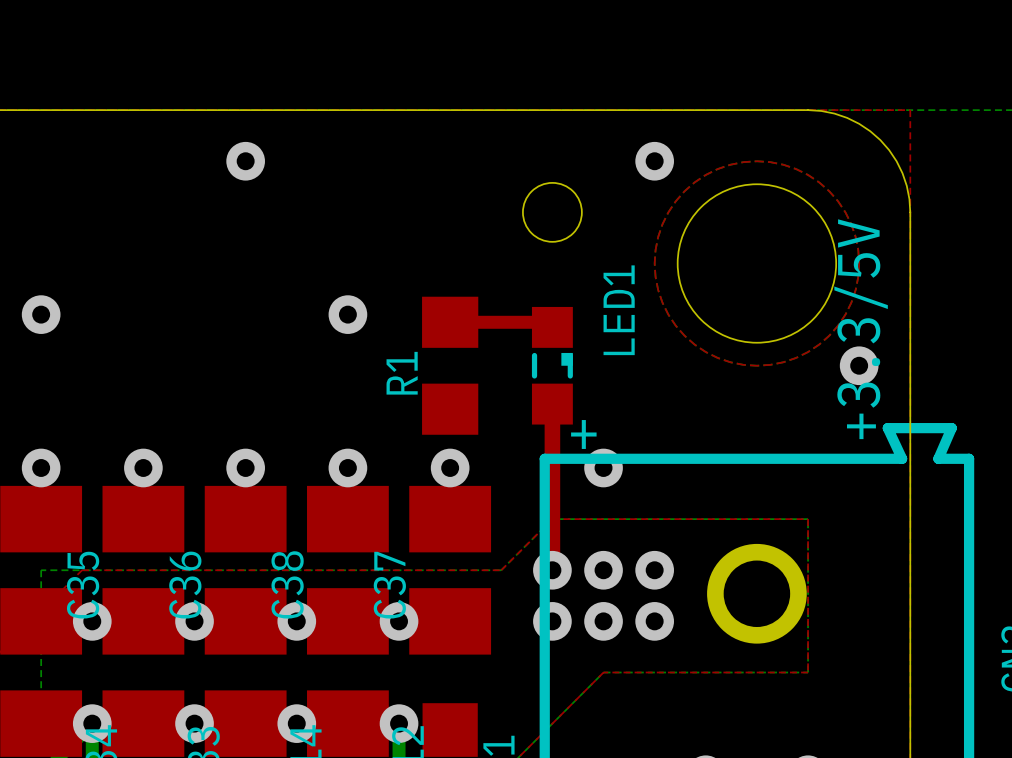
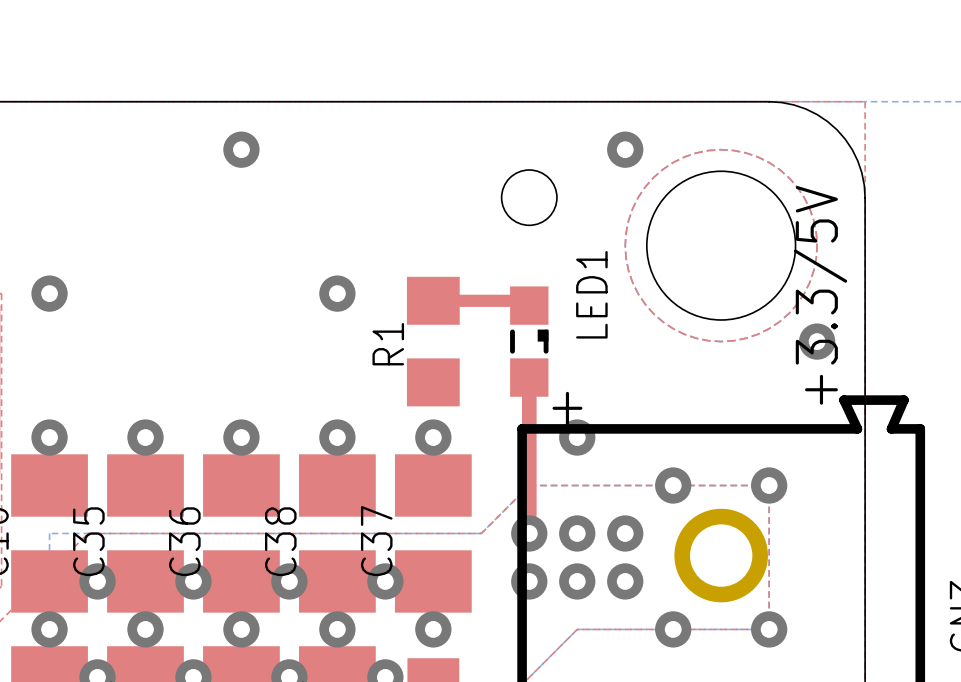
via: none -> (673, 485)
via: none -> (769, 485)
via: none -> (49, 629)
via: none -> (145, 629)
via: none -> (241, 629)
via: none -> (337, 629)
via: none -> (433, 629)
via: none -> (673, 629)
via: none -> (769, 629)

